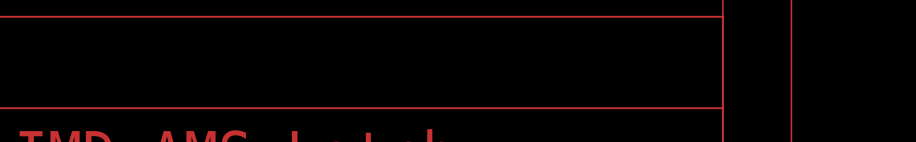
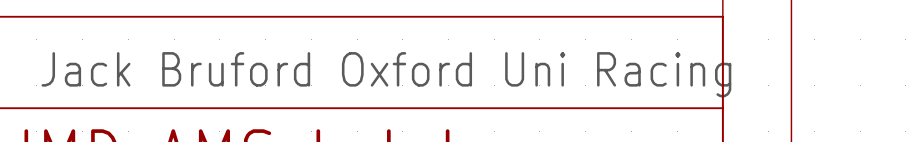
text: none -> Jack Bruford Oxford Uni Racing (386, 74)

